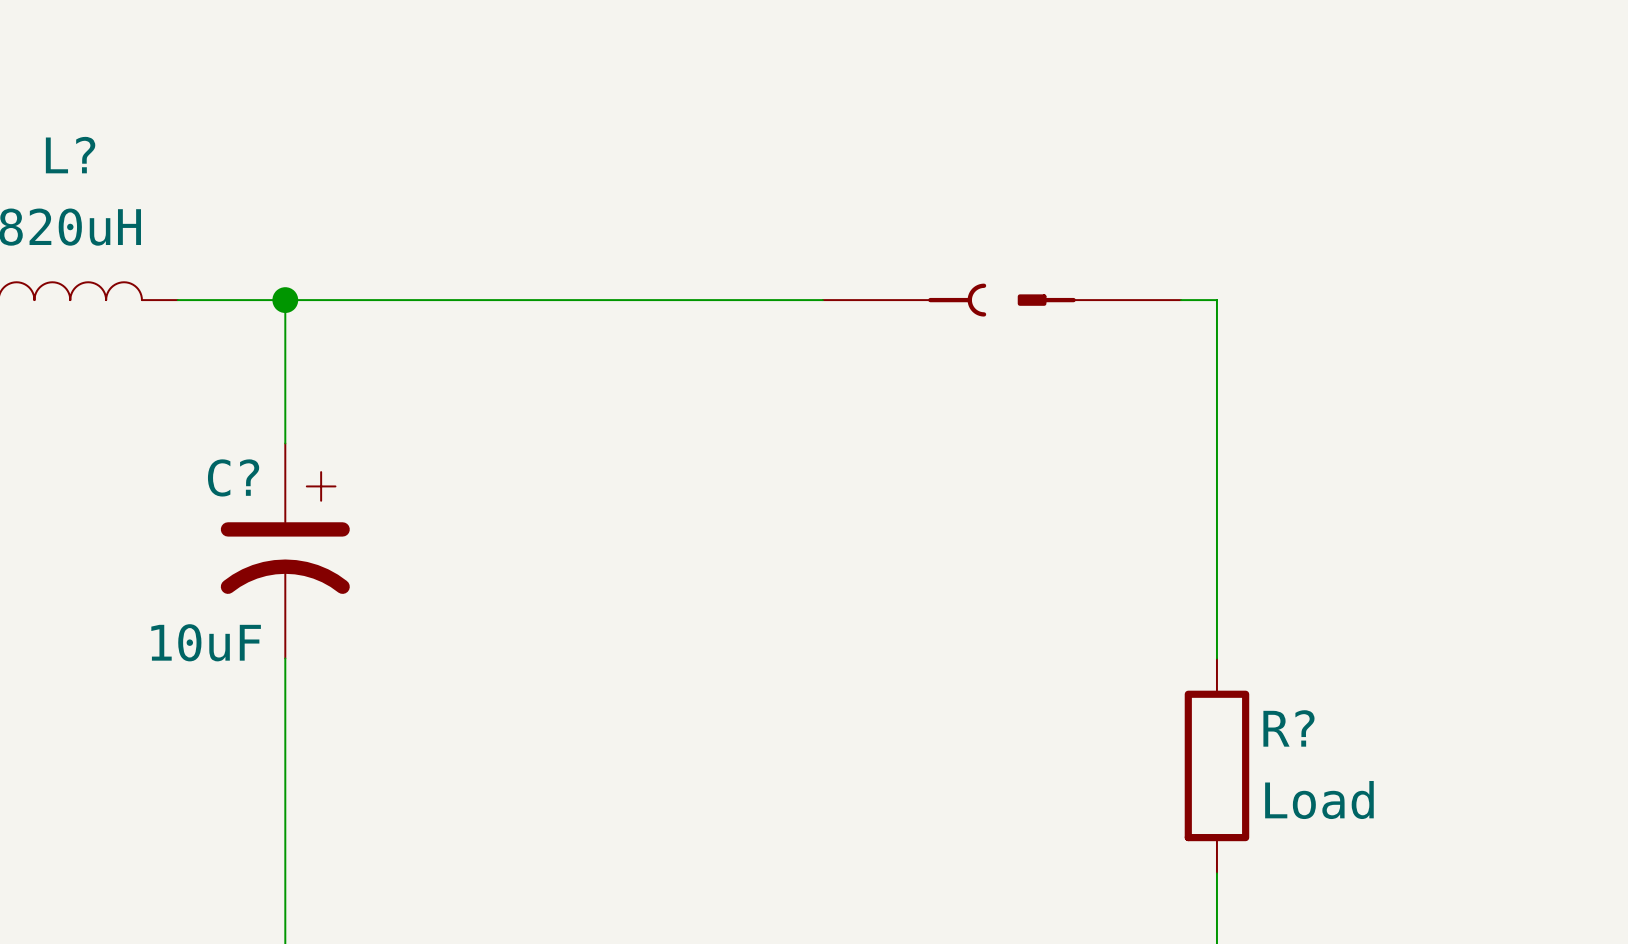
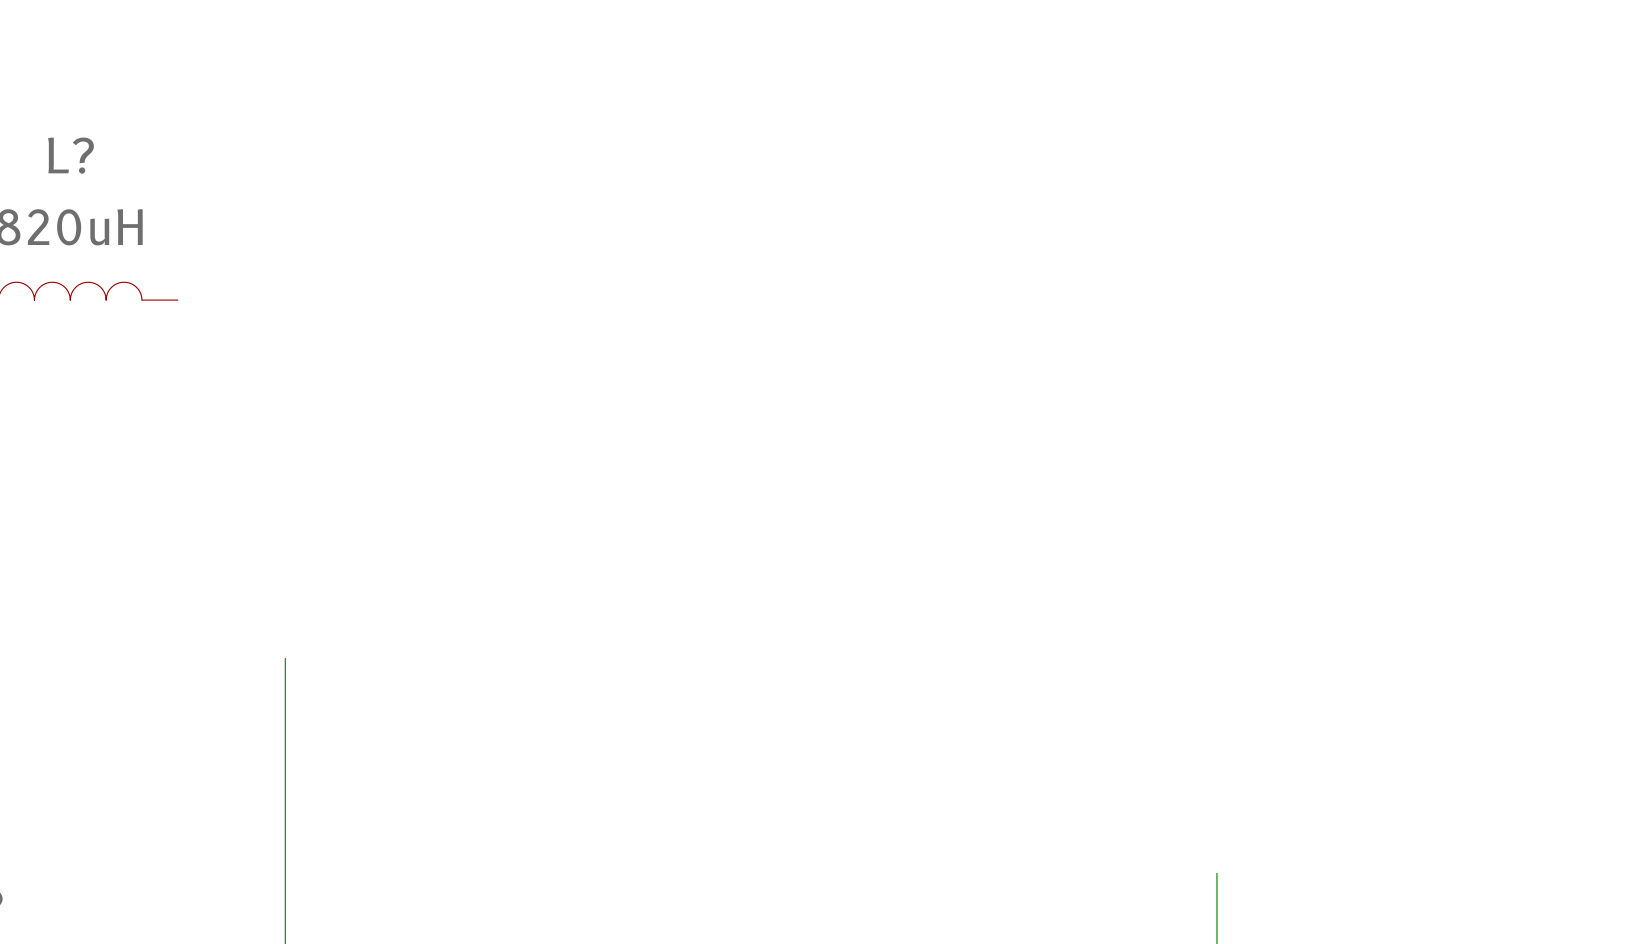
wire: (177, 300) (822, 300) -> none
wire: (285, 300) (285, 443) -> none
junction: (285, 300) -> none
part: (1001, 300) -> none
wire: (1181, 300) (1216, 300) (1216, 658) -> none
C?: 10uF (285, 550) -> none
R?: Load (1216, 765) -> none

